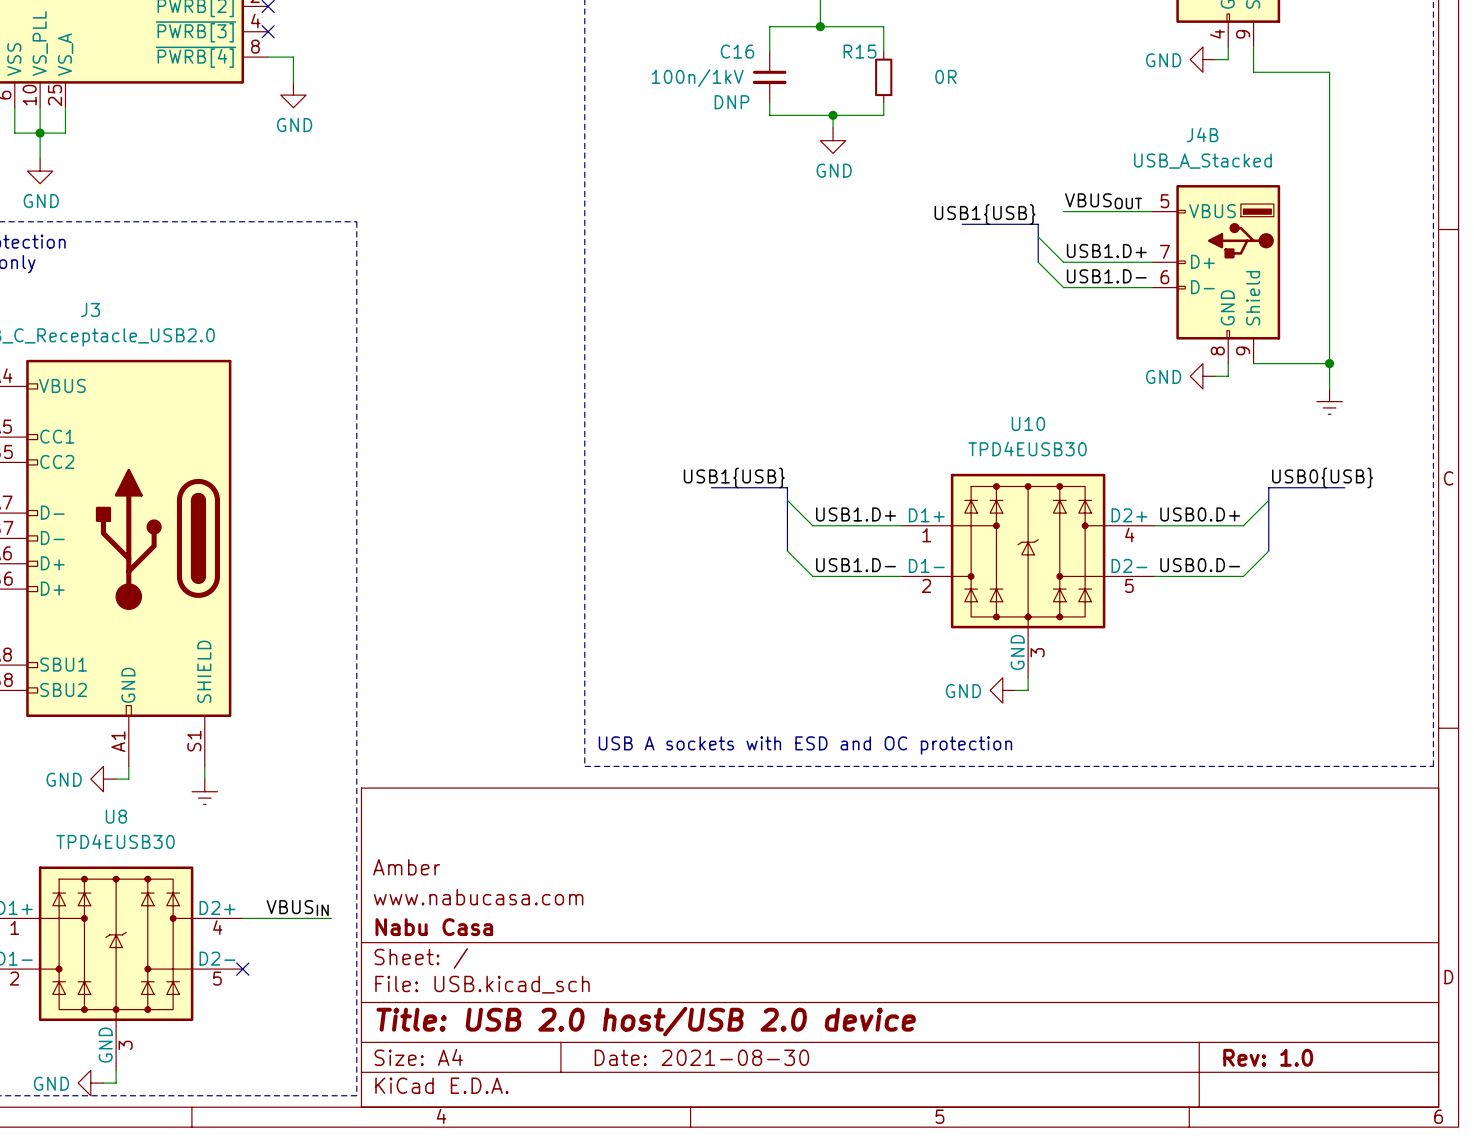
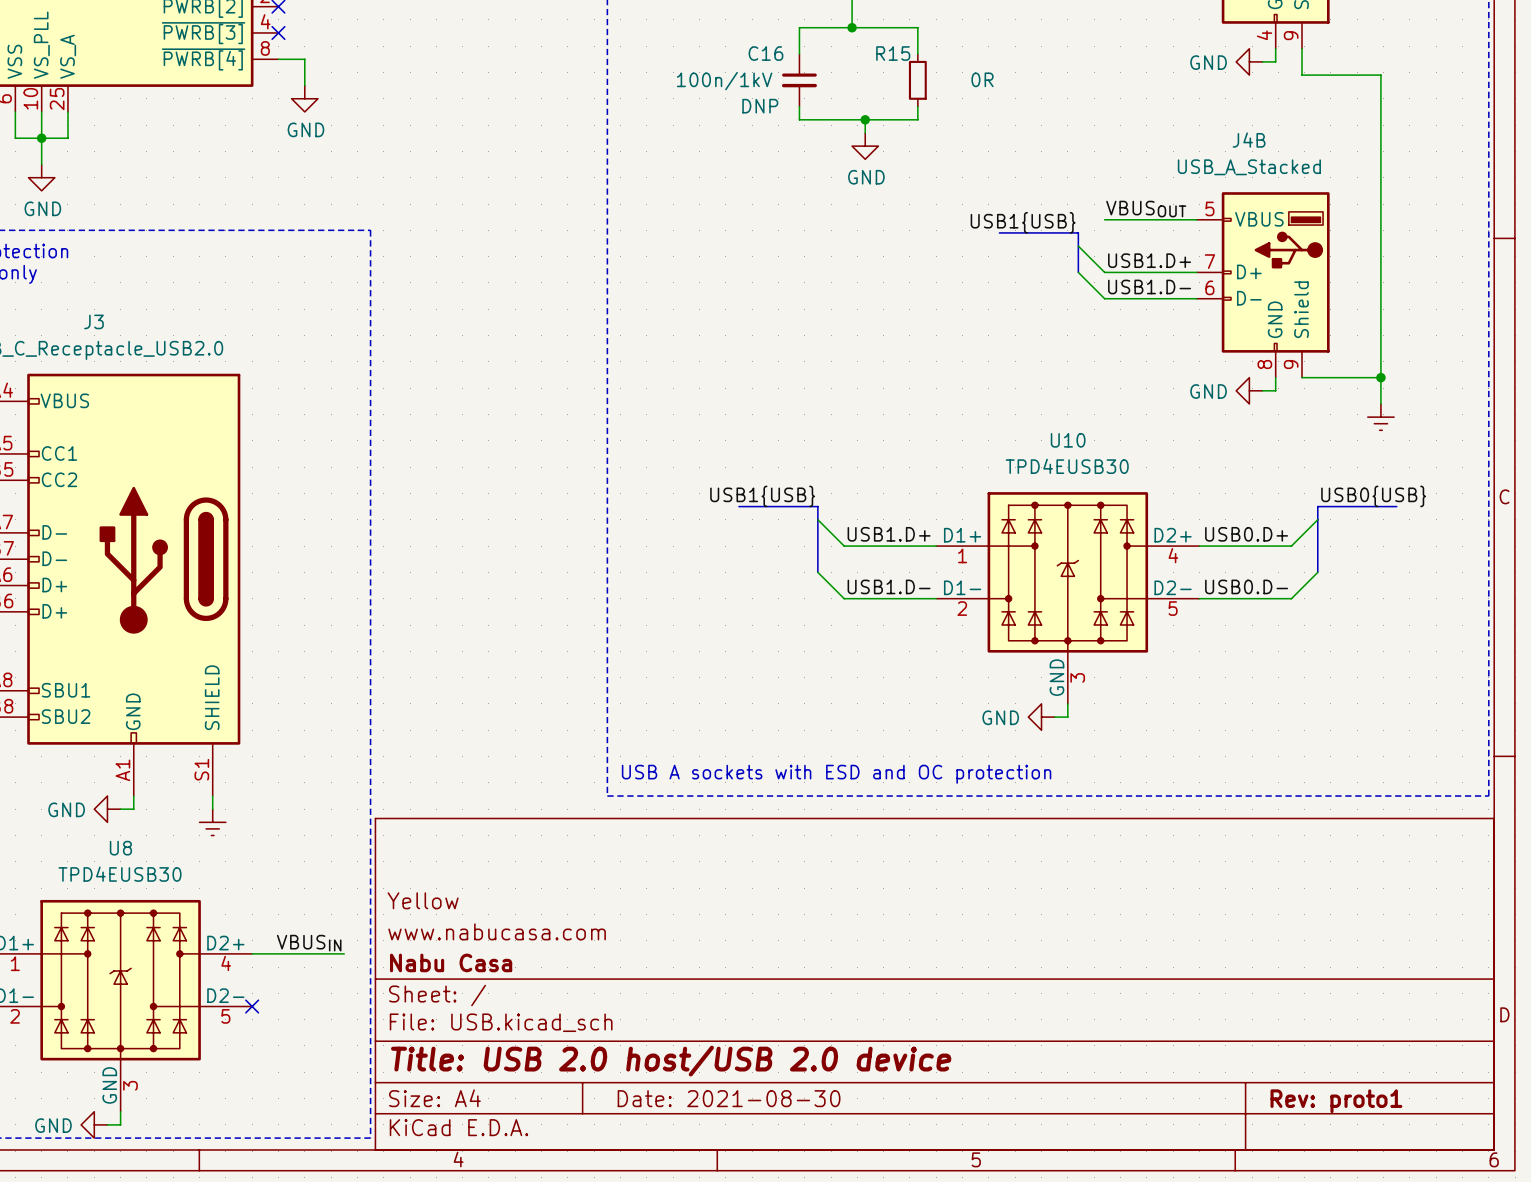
title block: Amber (406, 867) -> Yellow (423, 900)
title block: Rev: 1.0 (1268, 1057) -> Rev: proto1 (1336, 1101)

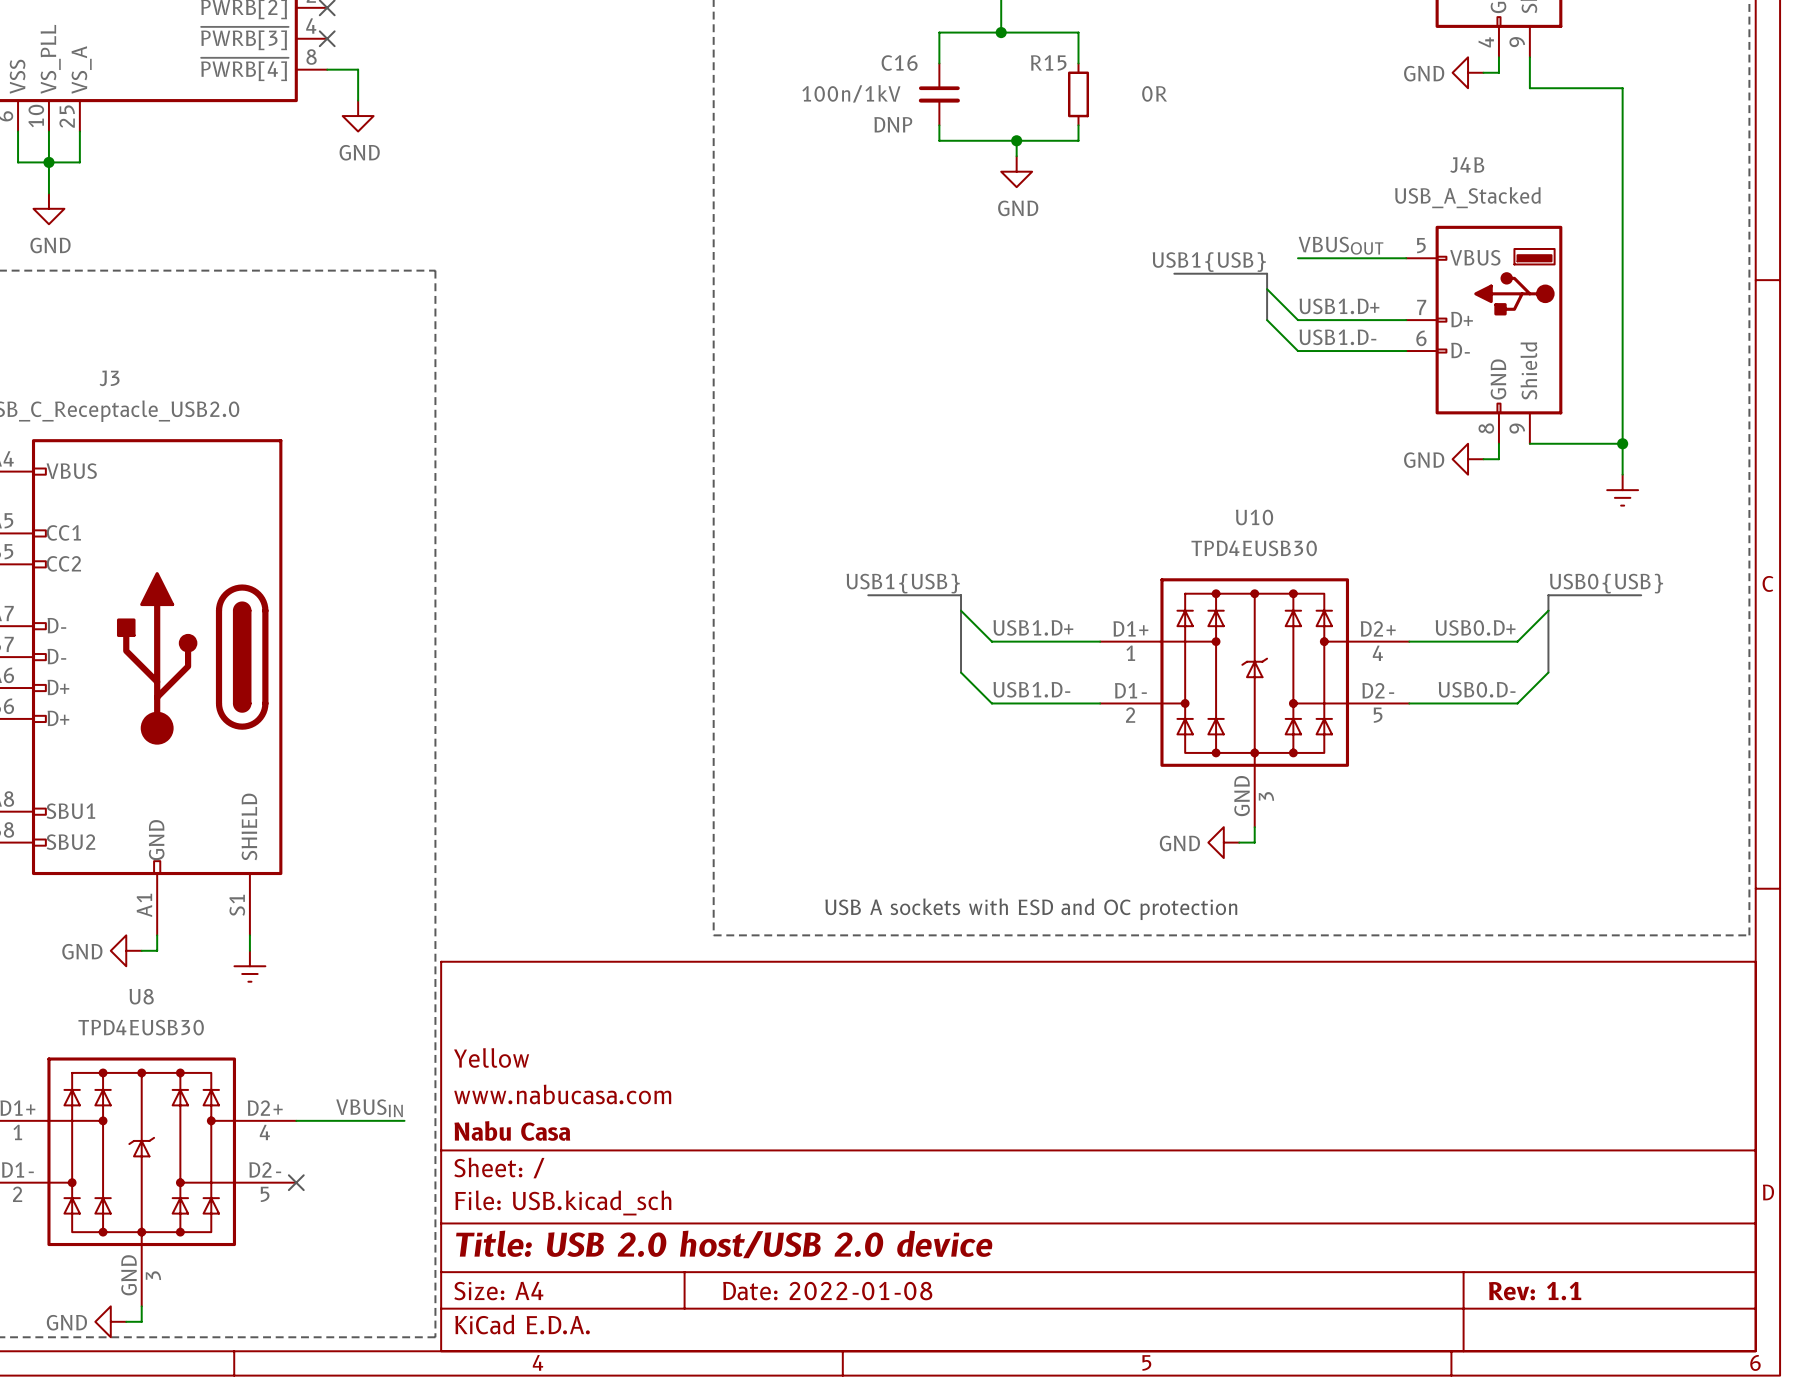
title block: Date: 2021-08-30 (729, 1098) -> Date: 2022-01-08 (827, 1291)
title block: Rev: proto1 (1336, 1101) -> Rev: 1.1 (1535, 1291)

